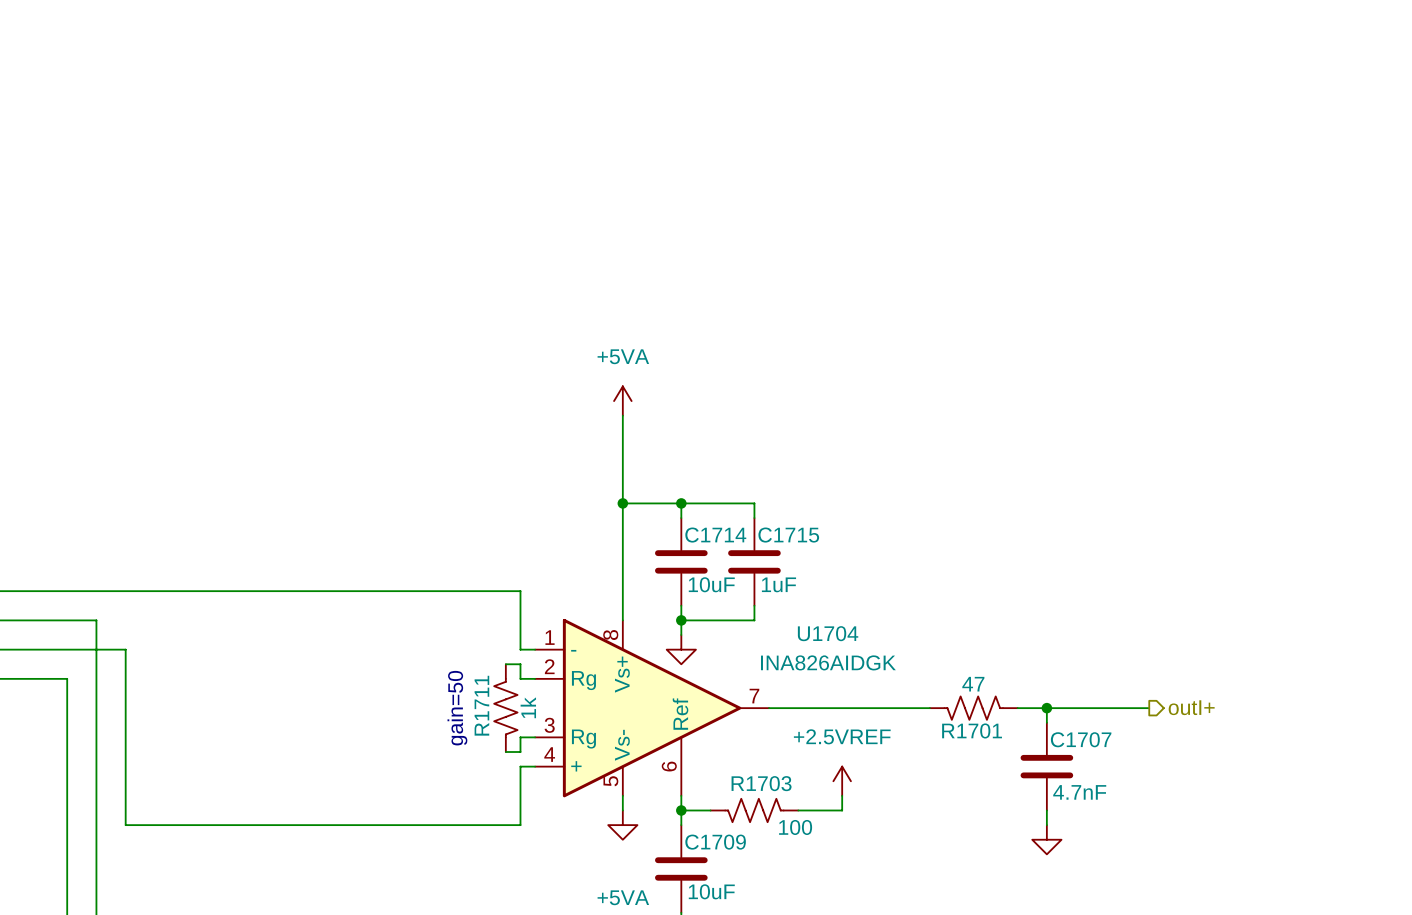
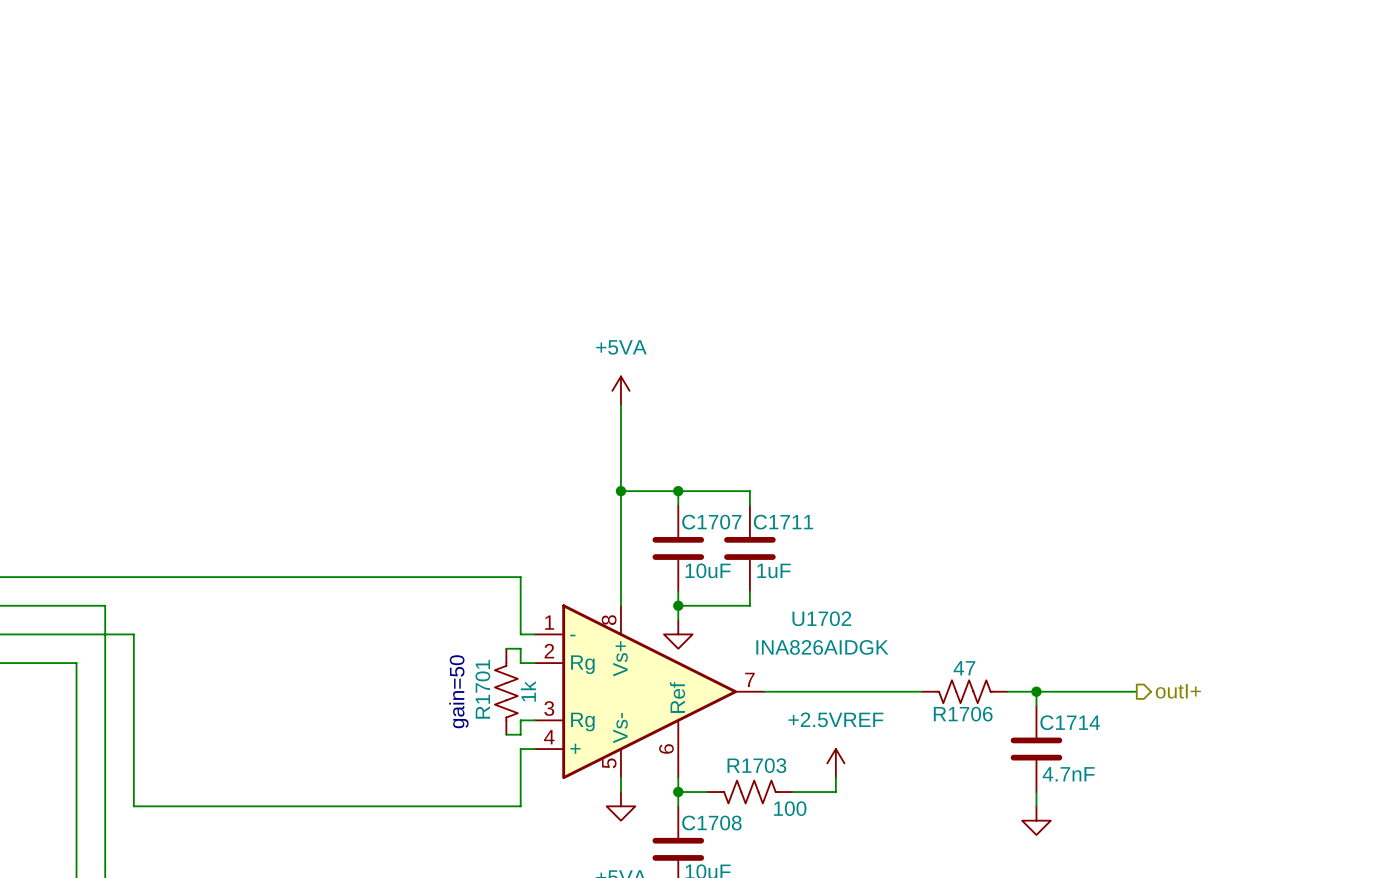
C1714 name: C1714 (715, 535) -> C1707 (711, 522)
C1715 name: C1715 (788, 535) -> C1711 (783, 522)
U1704 name: U1704 (828, 633) -> U1702 (821, 618)
R1711 name: R1711 (481, 705) -> R1701 (482, 689)
R1701 name: R1701 (972, 730) -> R1706 (963, 714)
C1707 name: C1707 (1081, 739) -> C1714 (1070, 722)
C1709 name: C1709 (715, 842) -> C1708 (711, 823)

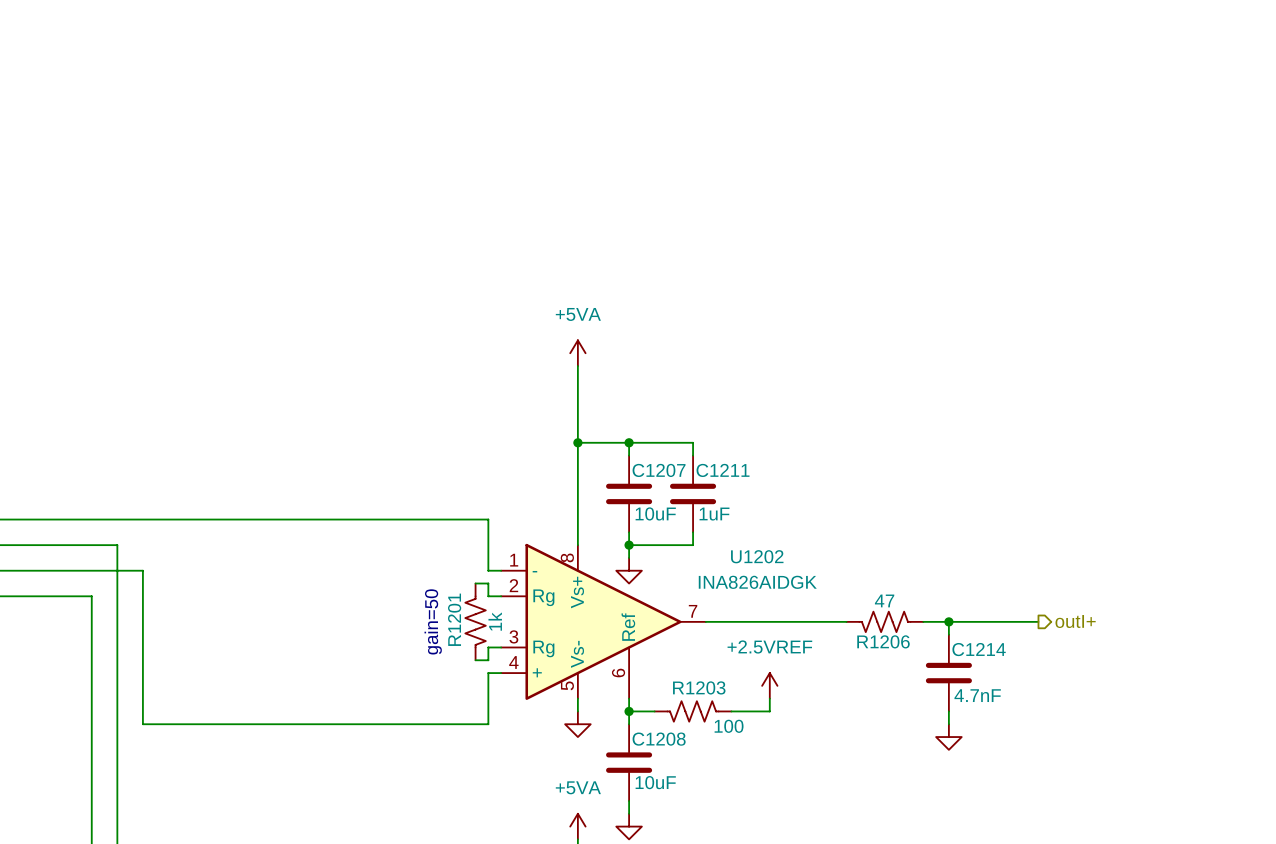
C1707 name: C1707 (711, 522) -> C1207 (659, 470)
C1711 name: C1711 (783, 522) -> C1211 (723, 470)
U1702 name: U1702 (821, 618) -> U1202 (757, 556)
R1701 name: R1701 (482, 689) -> R1201 (454, 619)
R1706 name: R1706 (963, 714) -> R1206 (883, 641)
C1714 name: C1714 (1070, 722) -> C1214 (979, 649)
R1703 name: R1703 (756, 765) -> R1203 (699, 687)
C1708 name: C1708 (711, 823) -> C1208 (659, 739)

